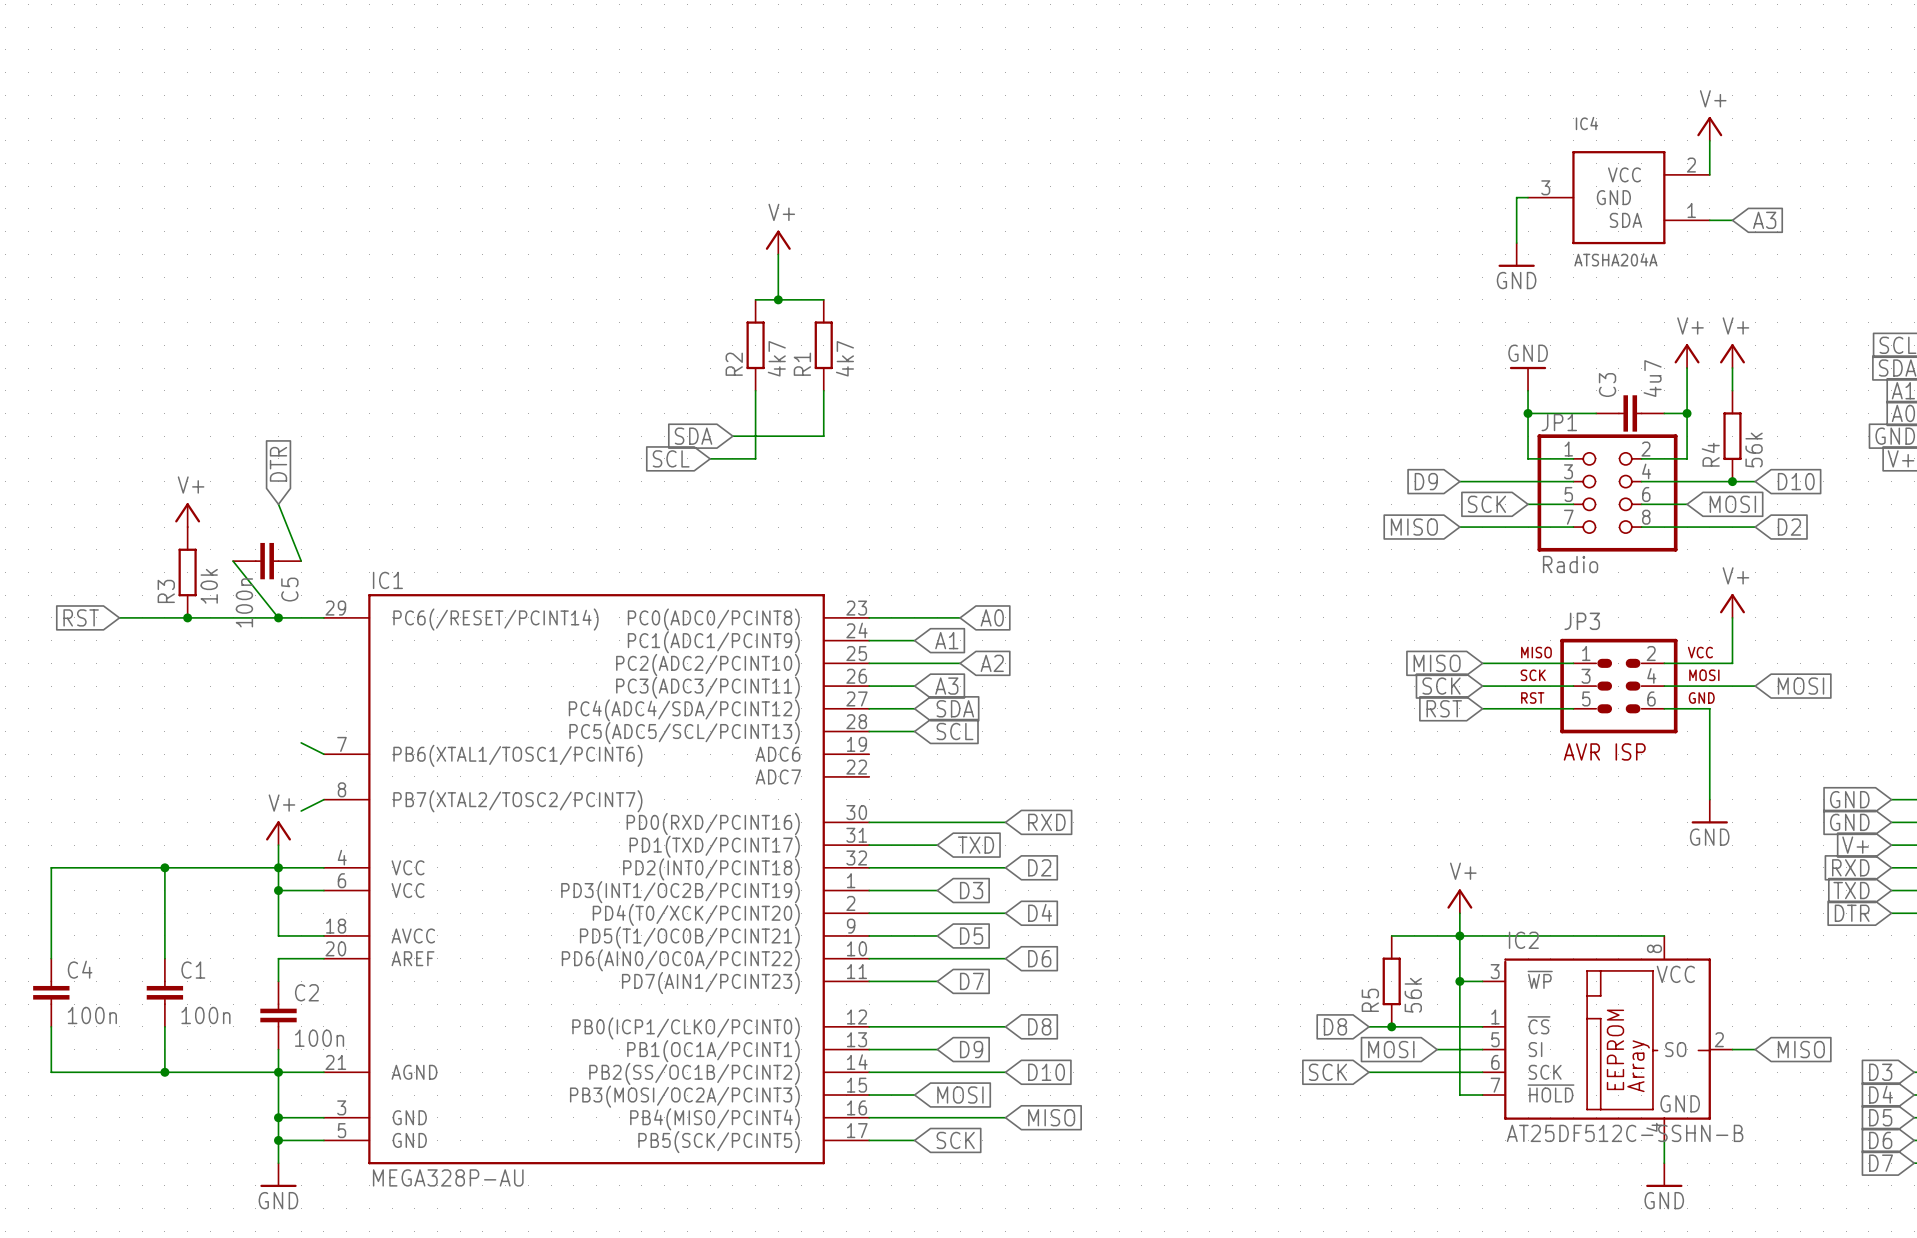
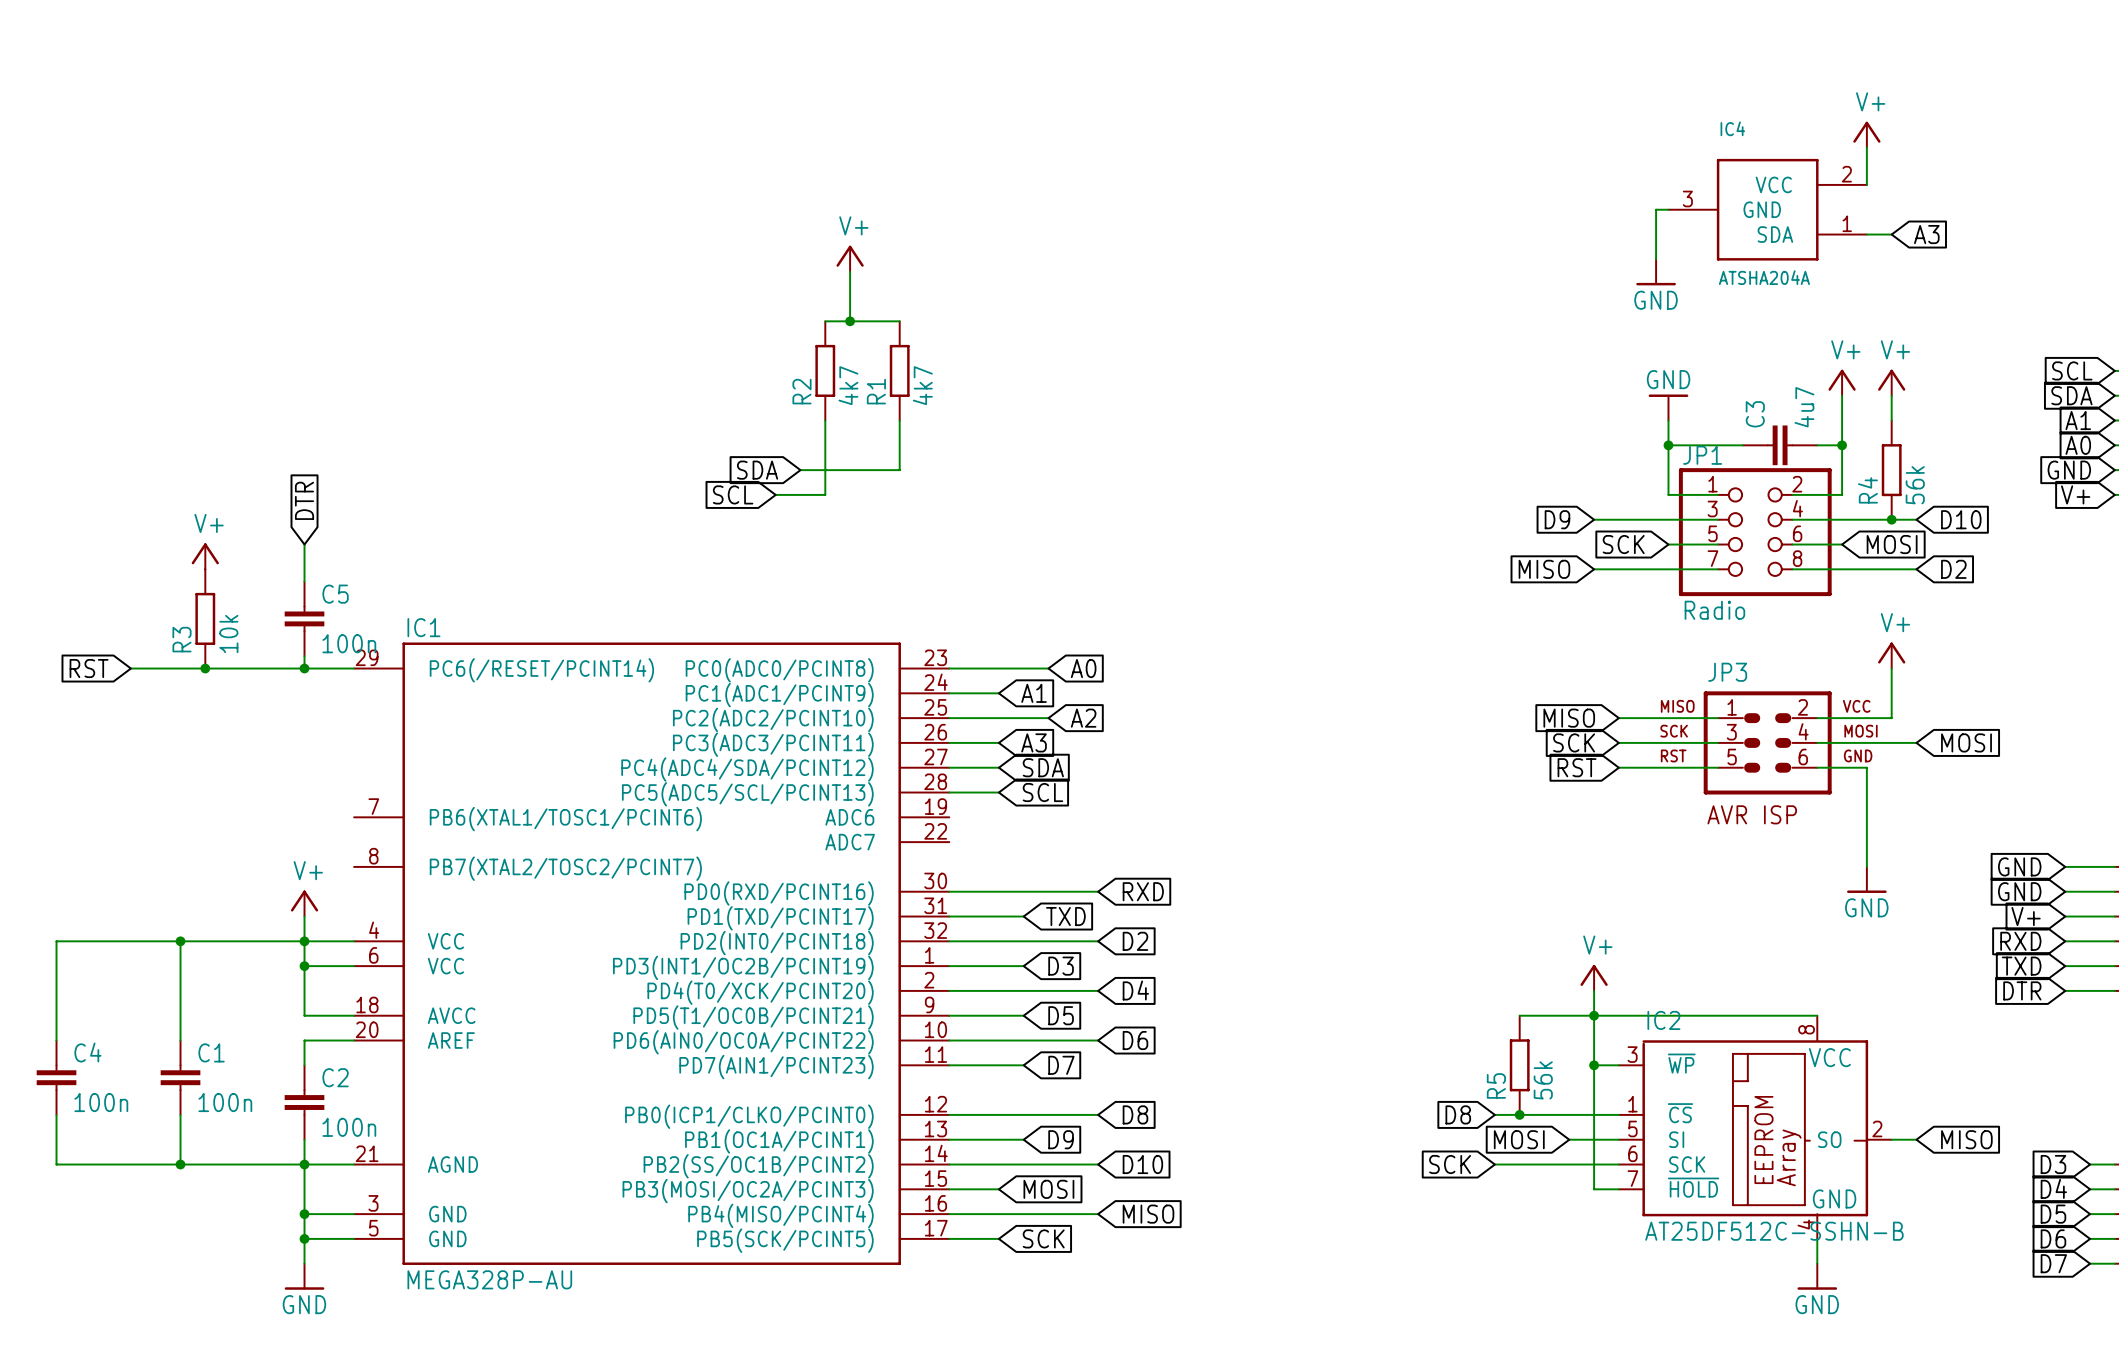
wire: (278, 504) (301, 561) -> (304, 544) (304, 581)
wire: (233, 561) (278, 617) -> (304, 656) (304, 668)
C5 rotation: 0° (267, 561) -> 90° clockwise (304, 618)
C5 name position: C5 (289, 589) -> C5 (335, 594)
C5 value position: 100n (244, 602) -> 100n (349, 643)
wire: (301, 742) (323, 754) -> none
wire: (323, 799) (301, 811) -> none

